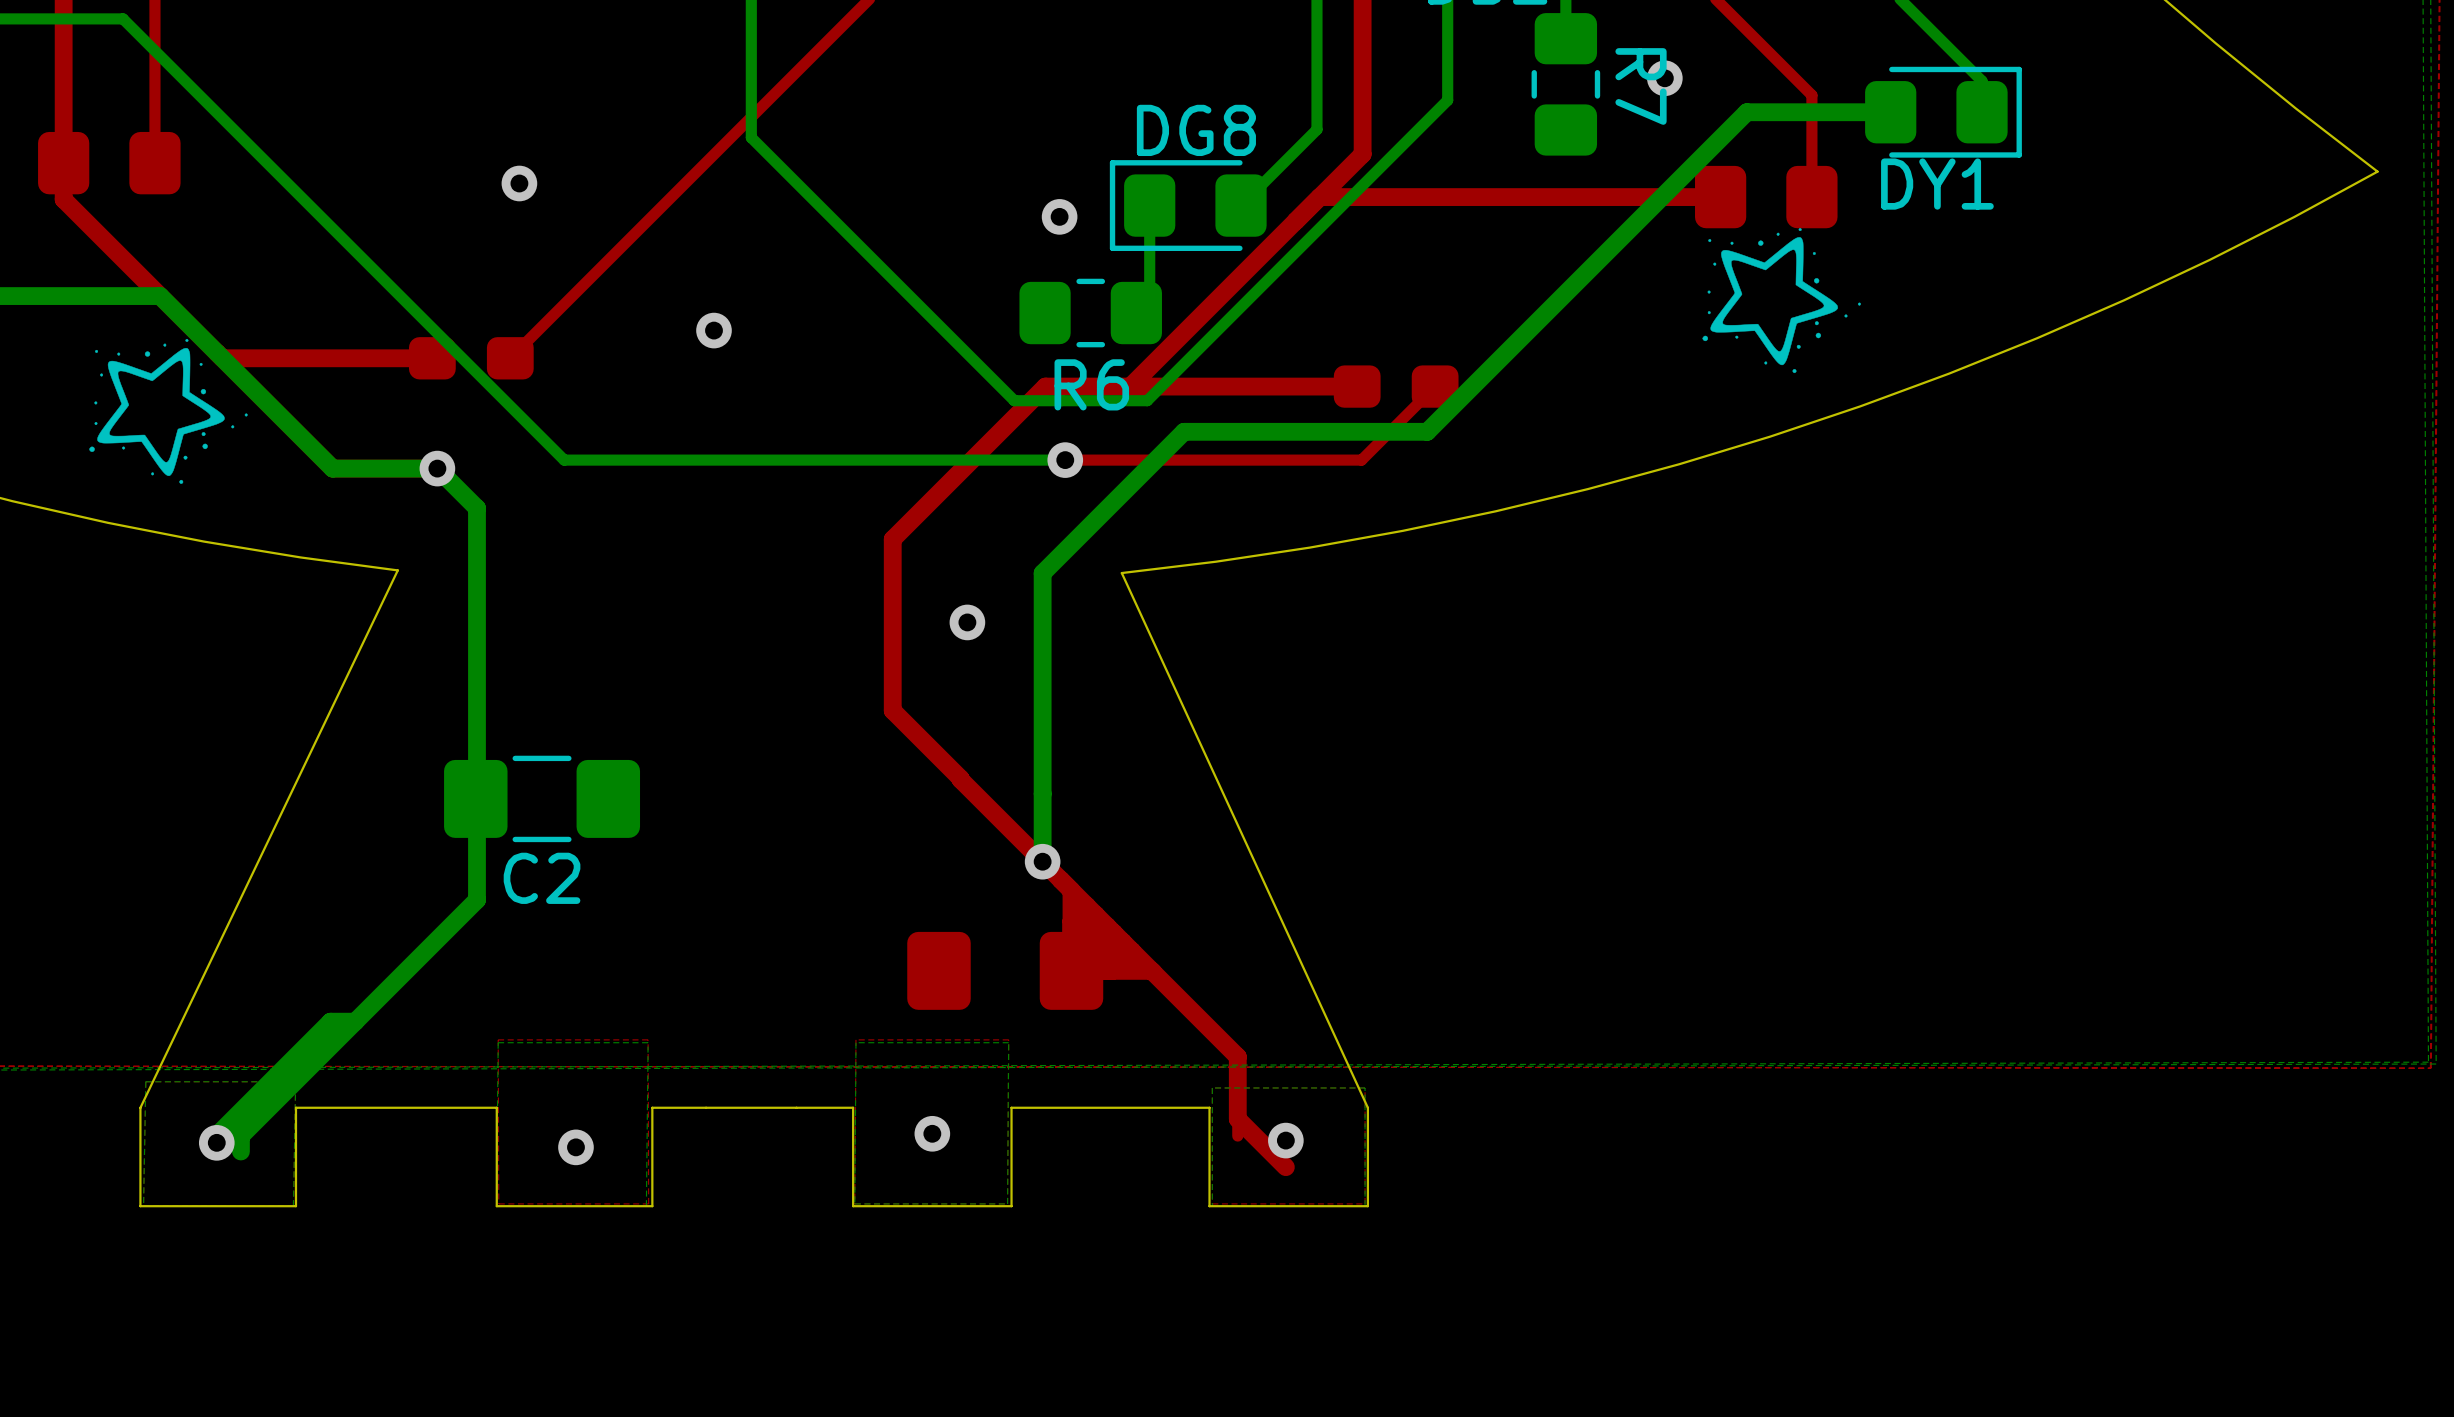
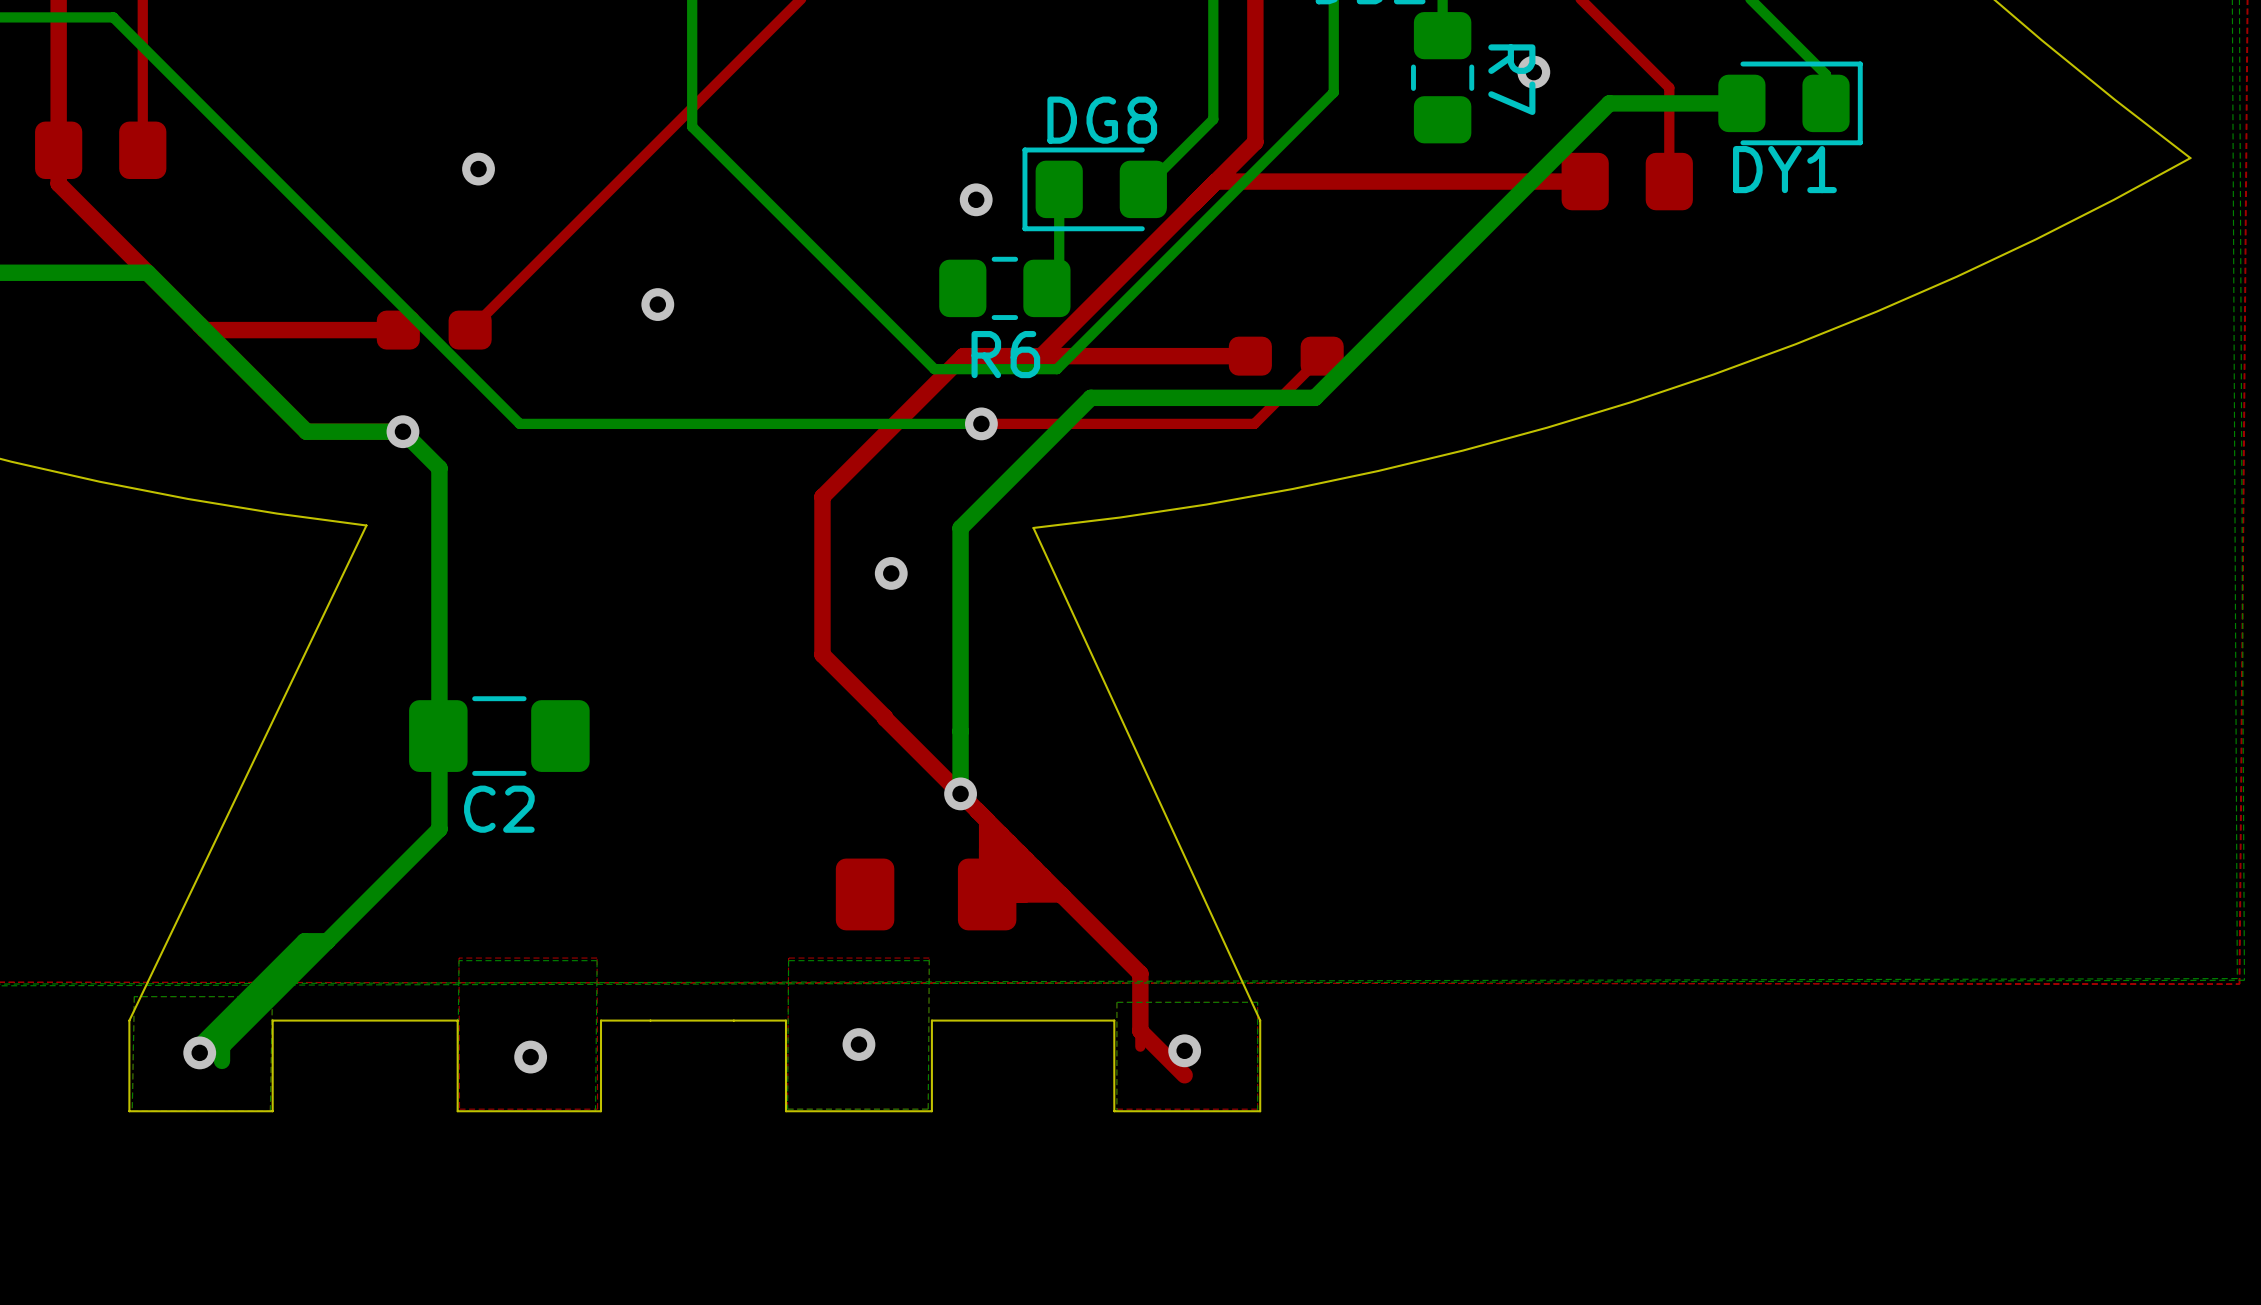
drawing: [1702, 228, 1861, 374] -> none
drawing: [89, 338, 248, 484] -> none

